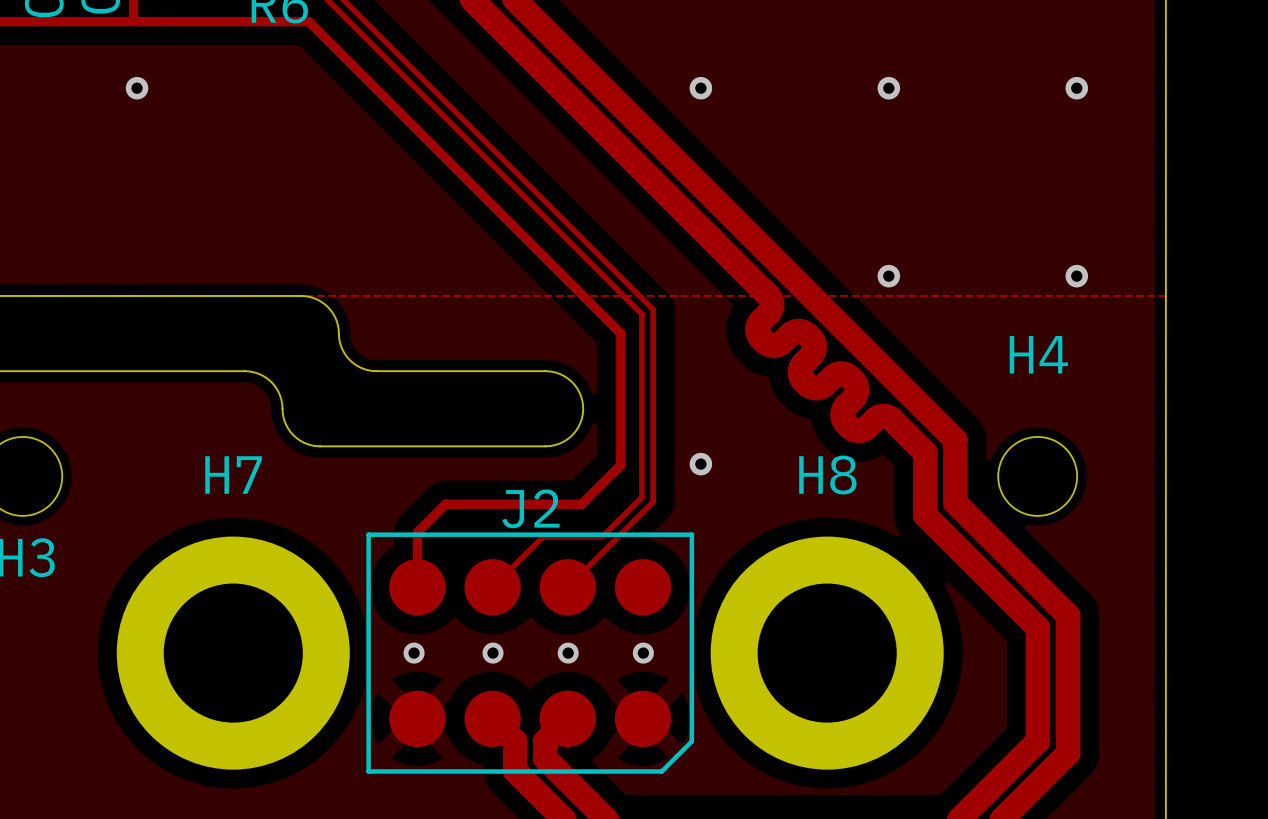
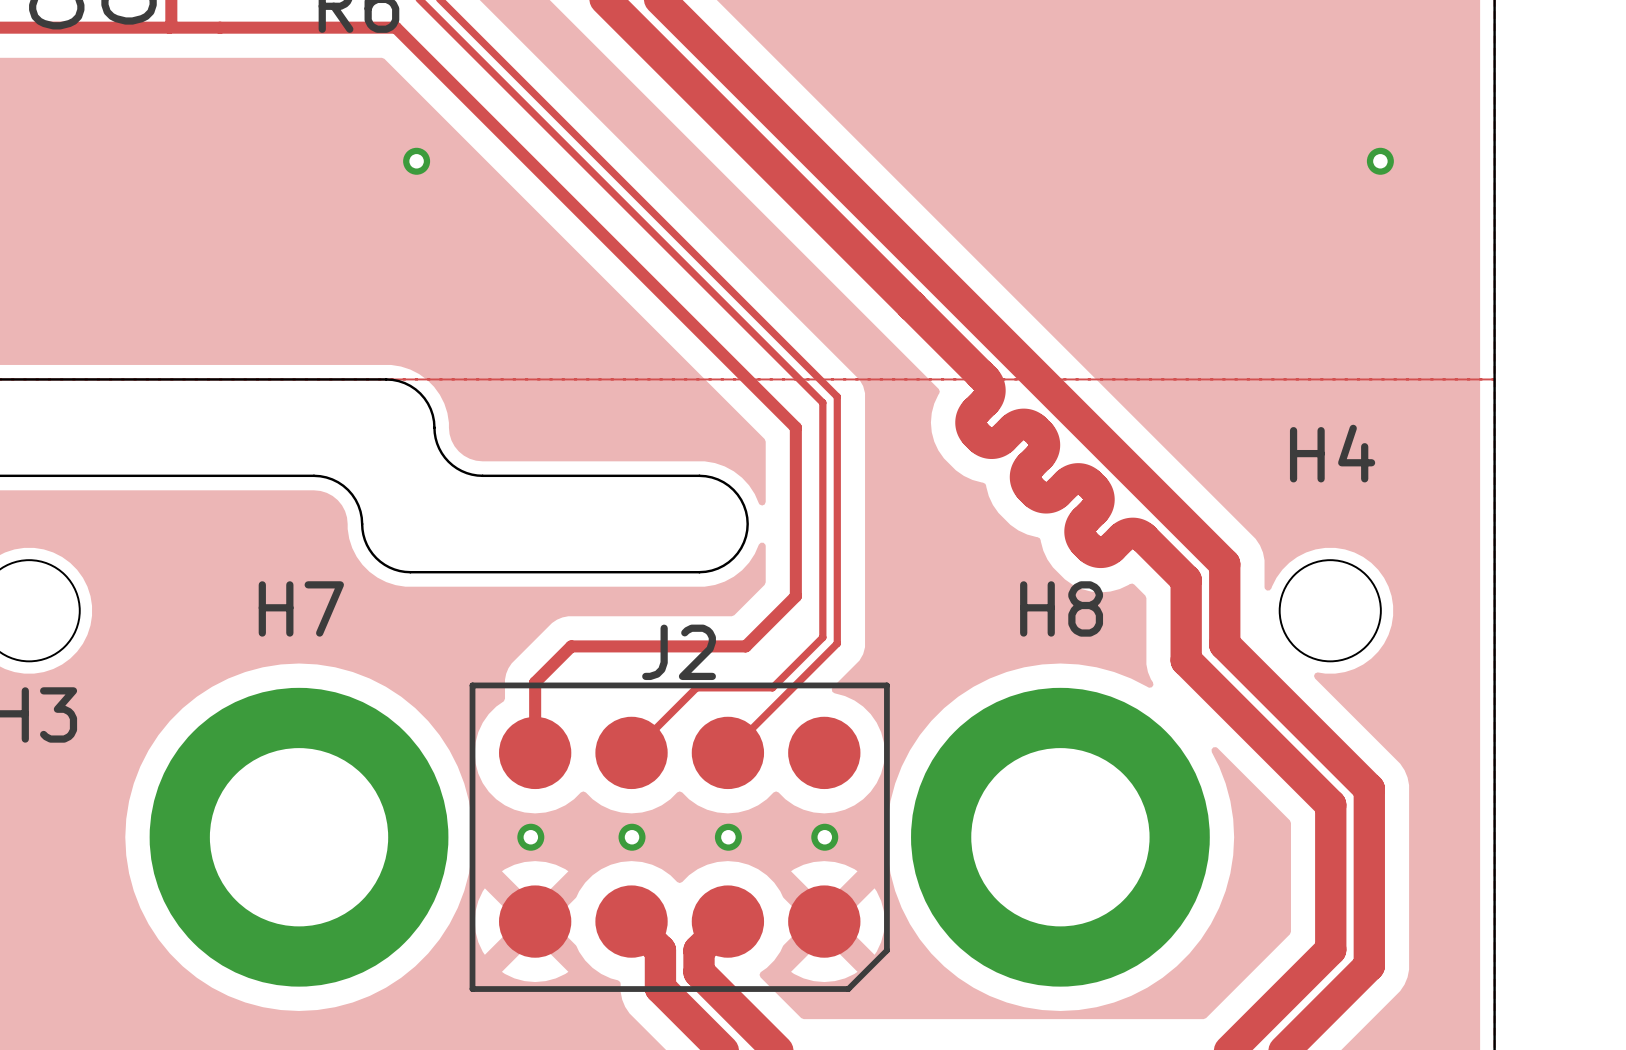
via: (137, 88) -> none
via: (700, 88) -> none
via: (888, 88) -> none
via: (1076, 88) -> none
via: none -> (416, 161)
via: none -> (1380, 161)
via: (888, 276) -> none
via: (1076, 276) -> none
via: (700, 464) -> none

